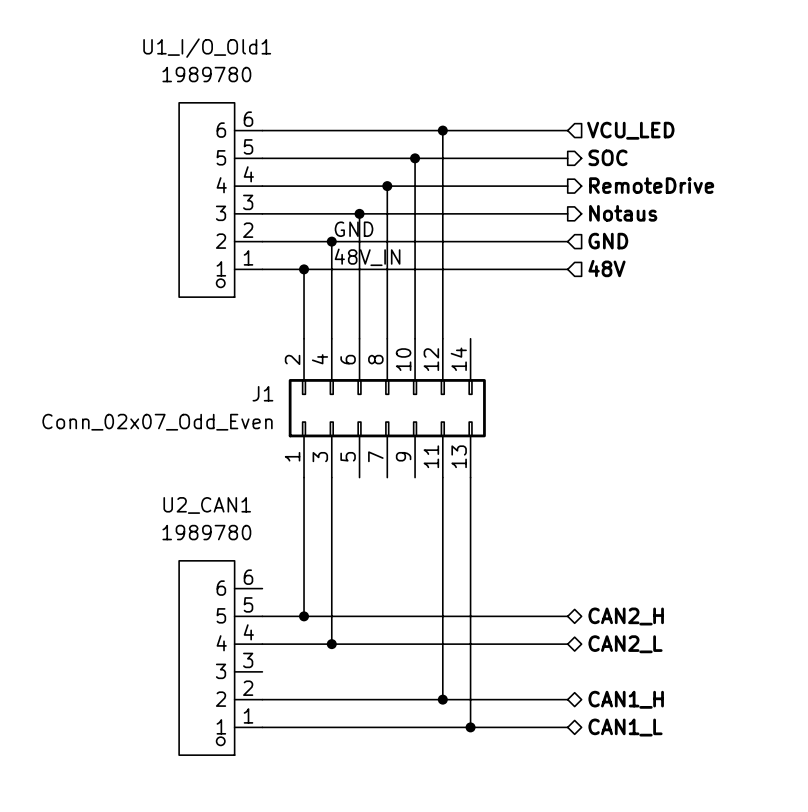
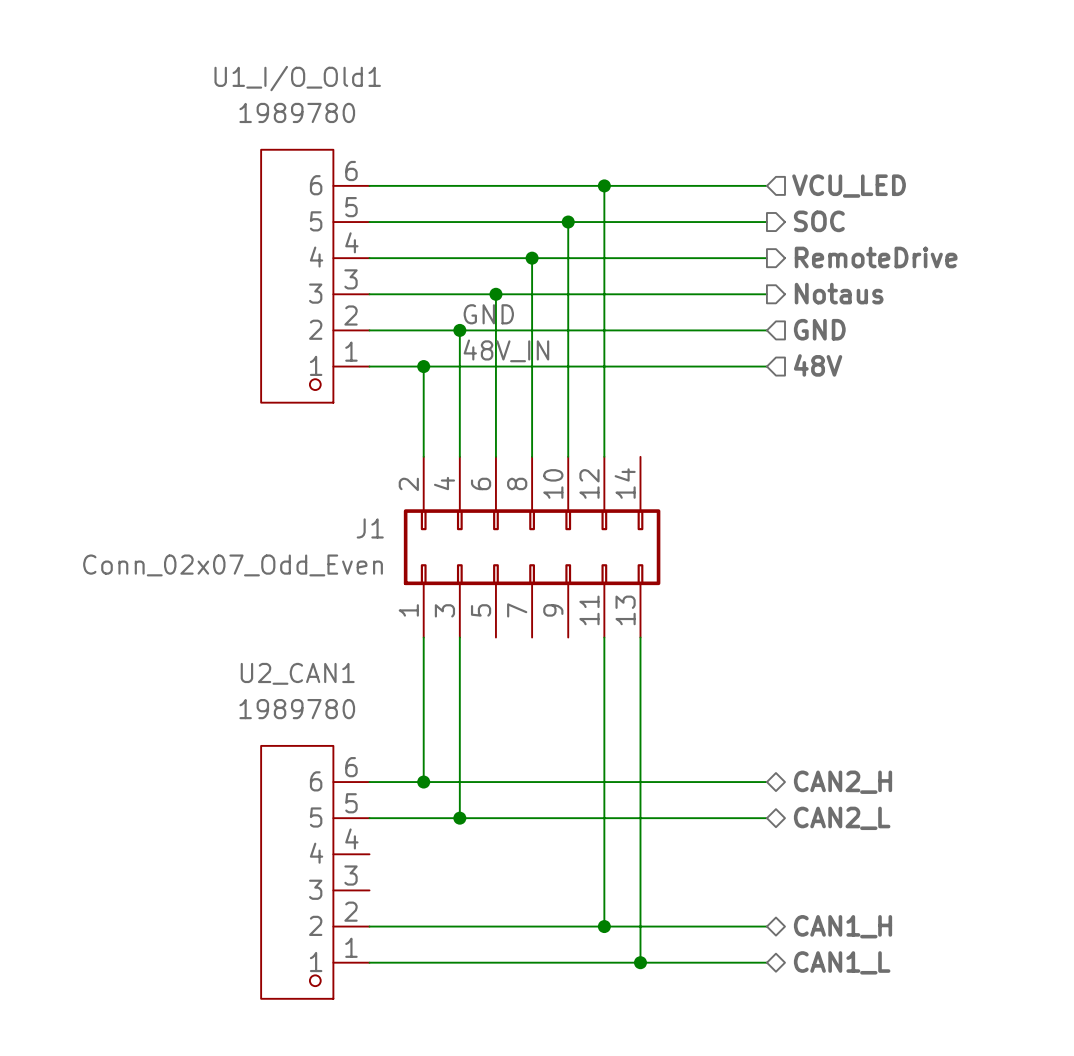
wire: (304, 588) (304, 616) -> none
junction: none -> (423, 782)
hierarchical label: none -> CAN2_H (843, 782)
junction: (304, 616) -> none
wire: (331, 616) (331, 644) -> none
junction: none -> (459, 818)
hierarchical label: CAN2_H (626, 616) -> CAN2_L (842, 818)
wire: (262, 644) (567, 644) -> (369, 782) (766, 782)
junction: (331, 644) -> none
hierarchical label: CAN2_L (625, 644) -> none

